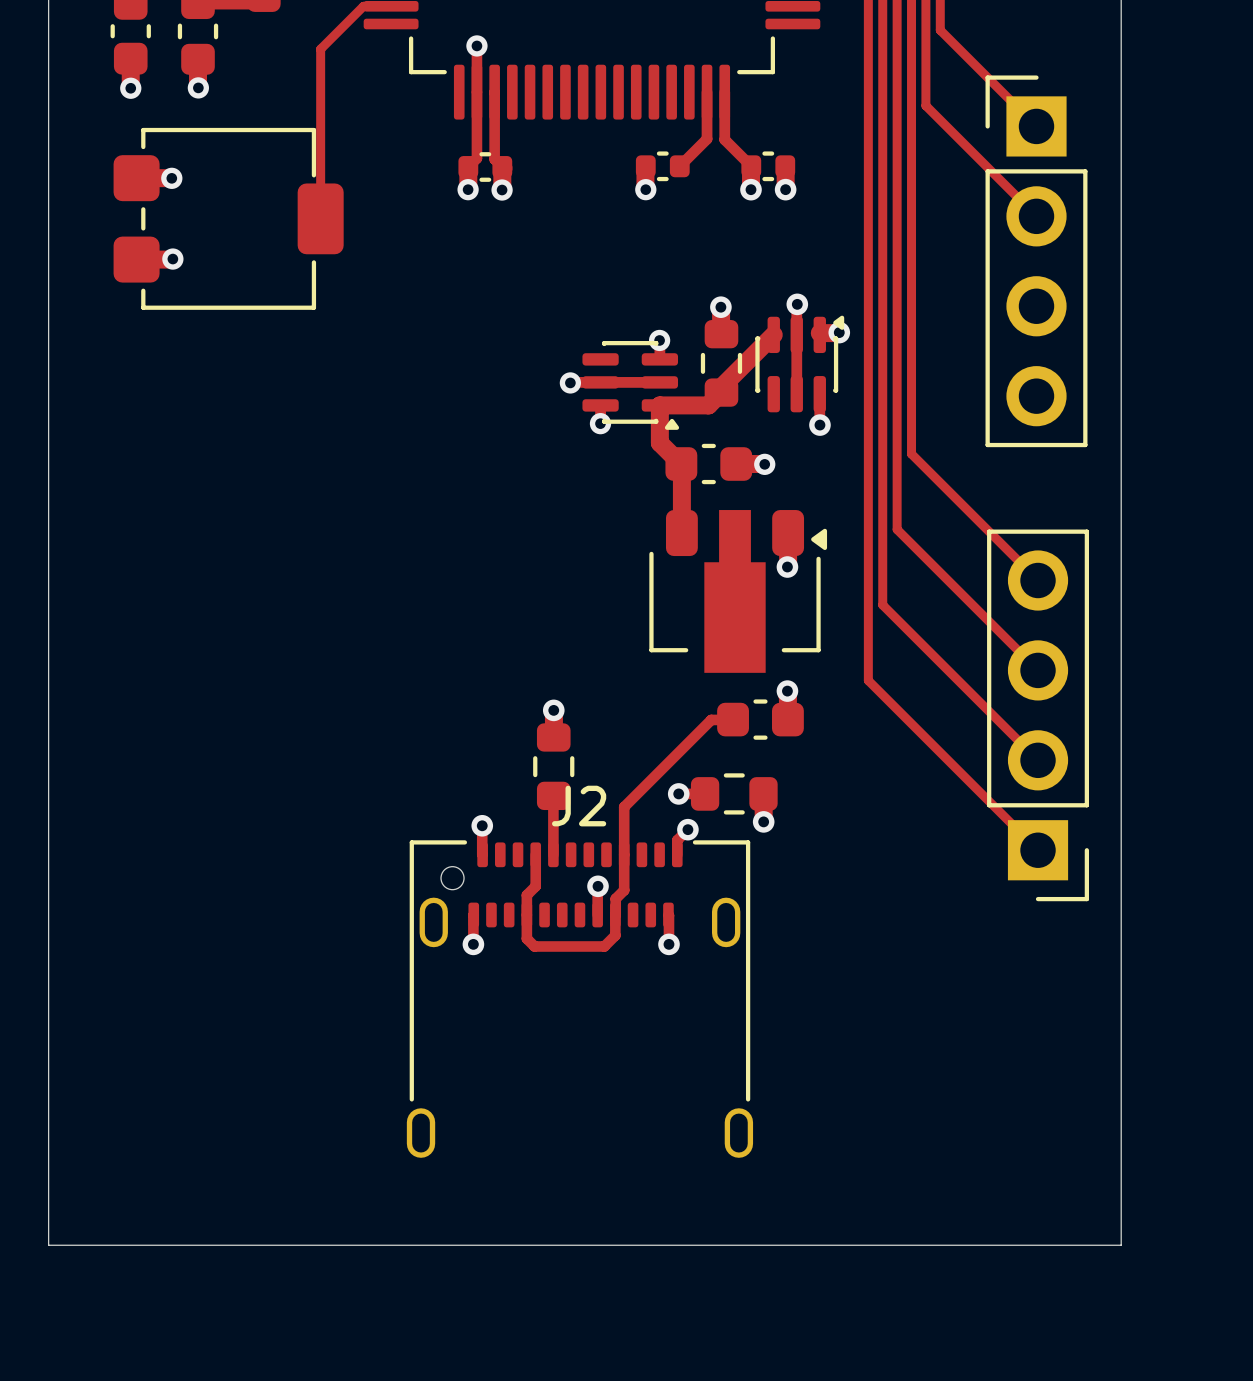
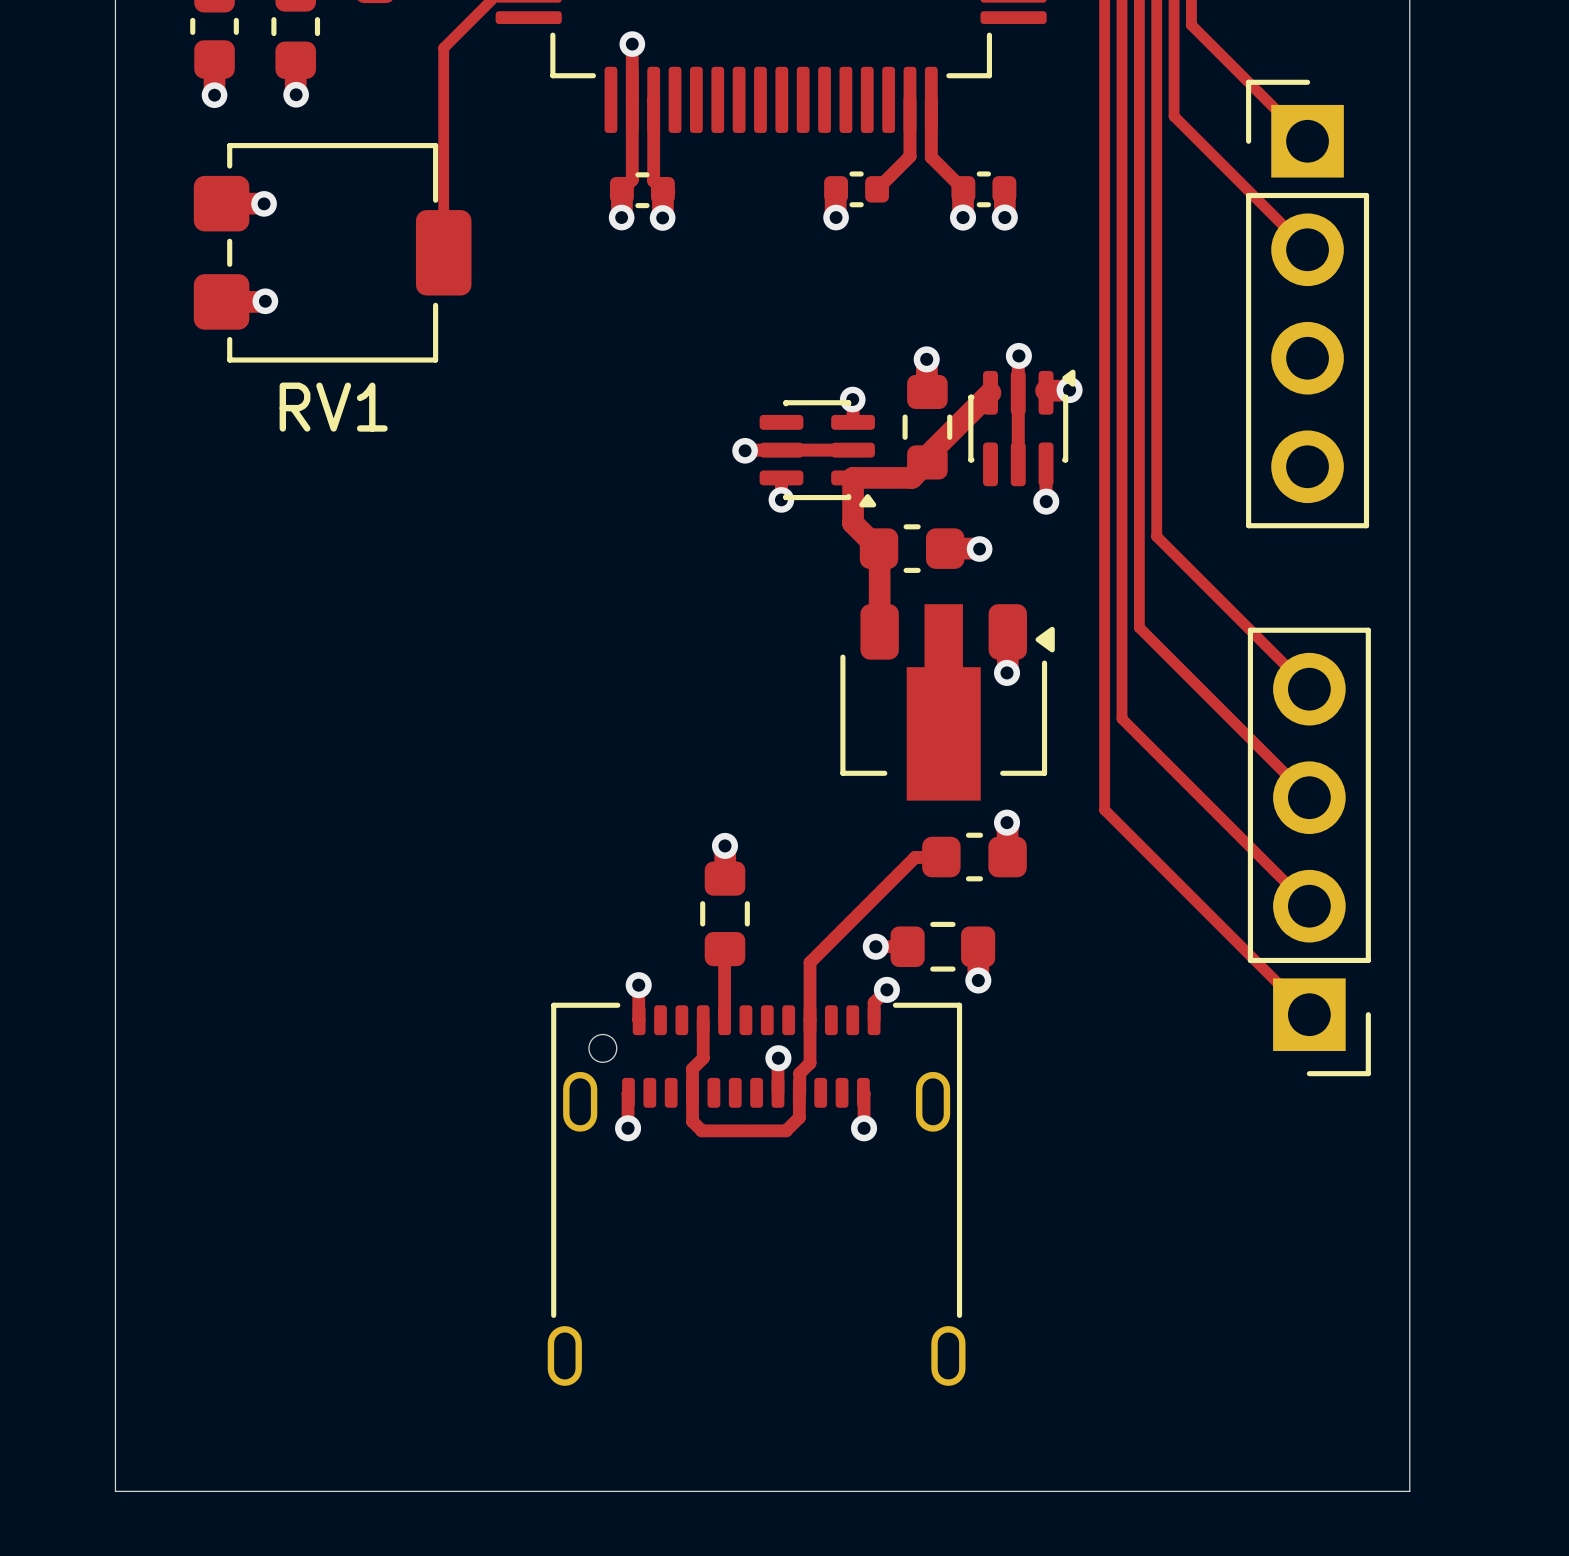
RV1 name: none -> RV1 (333, 407)
J2 name: J2 (579, 806) -> none

